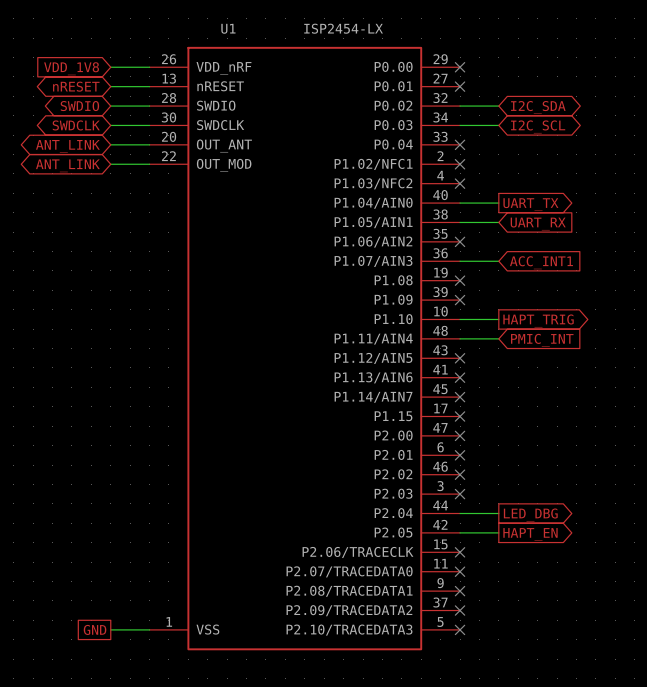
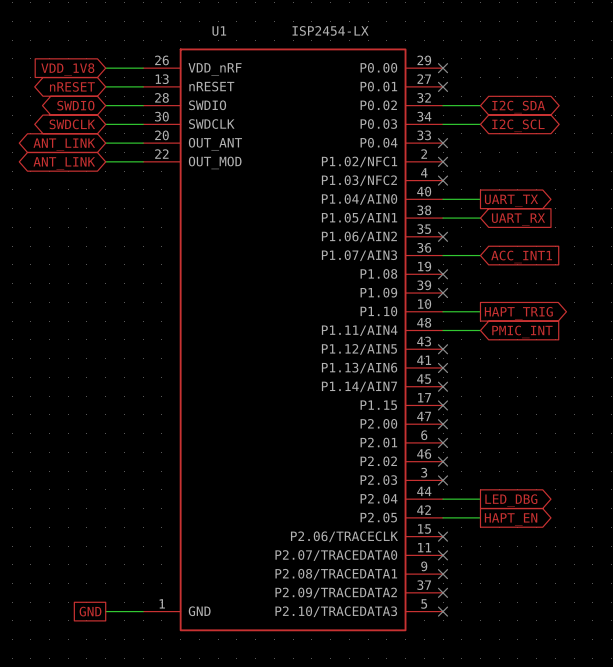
U1 pin name: VSS (207, 629) -> GND (199, 611)

